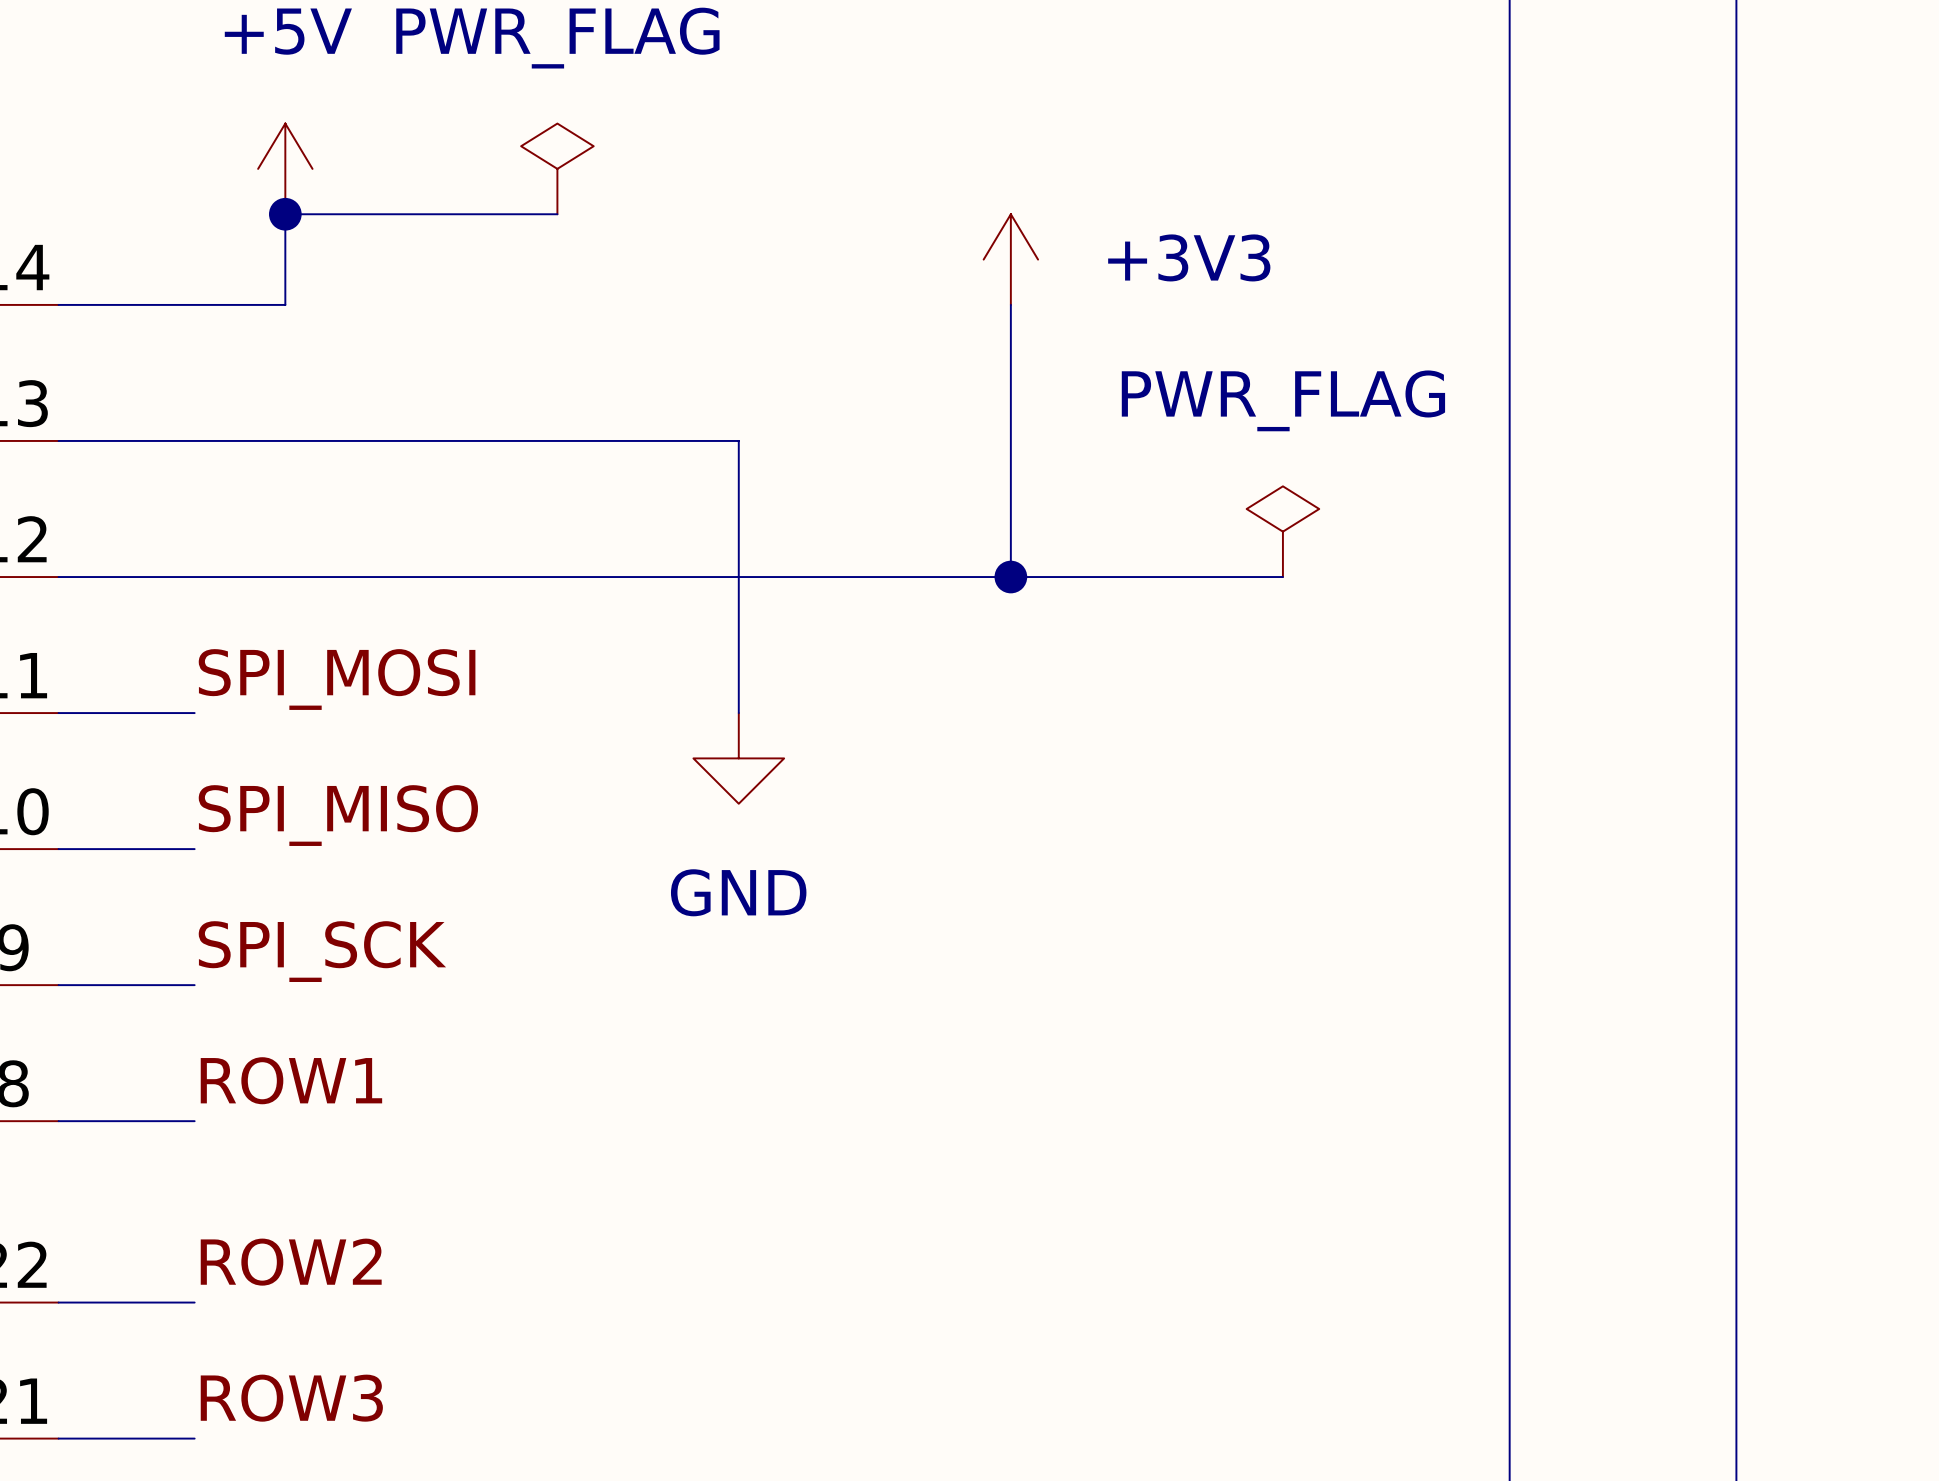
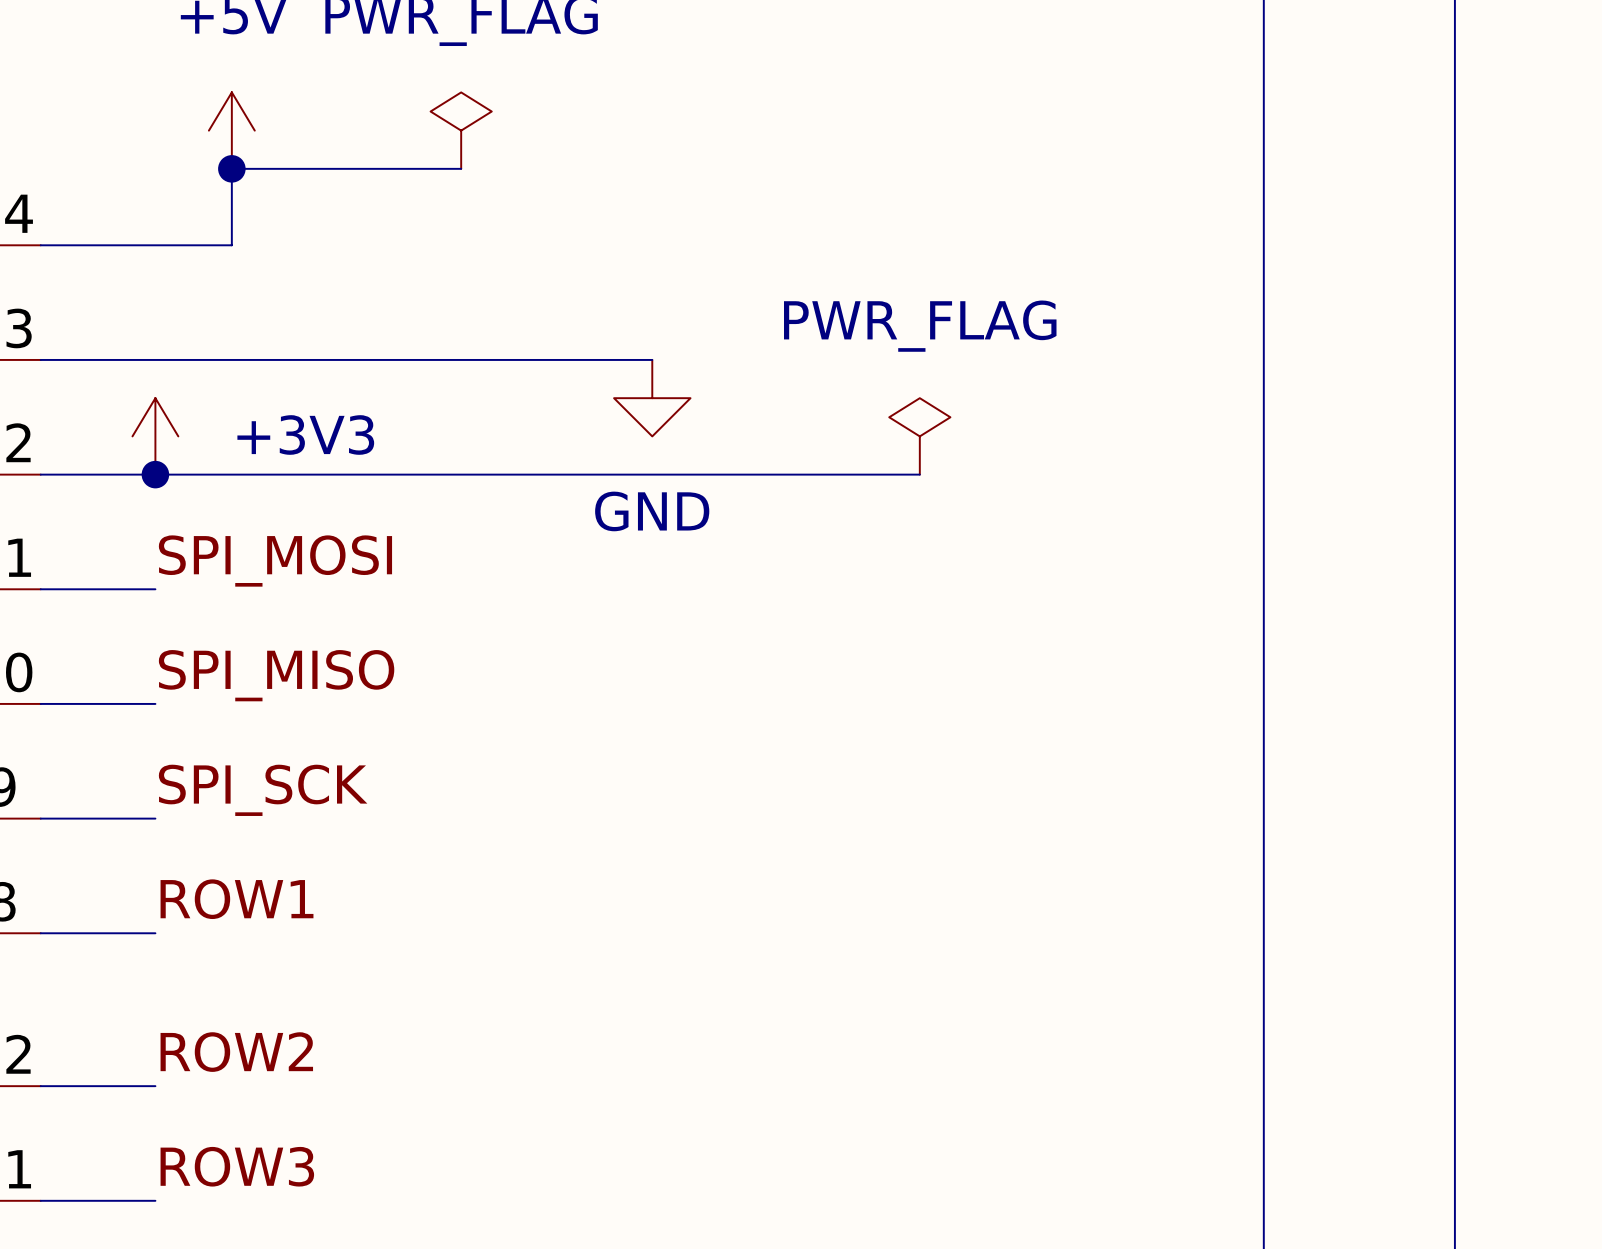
power symbol position: +3V3 (1010, 259) -> +3V3 (155, 436)
wire: (1010, 304) (1010, 577) -> none
wire: (738, 440) (738, 713) -> (614, 359) (652, 359)
power symbol position: PWR_FLAG (1282, 531) -> PWR_FLAG (919, 436)
junction: none -> (155, 474)
junction: (1010, 577) -> none
wire: (1101, 577) (1282, 577) -> none
power symbol position: GND (738, 758) -> GND (652, 398)

